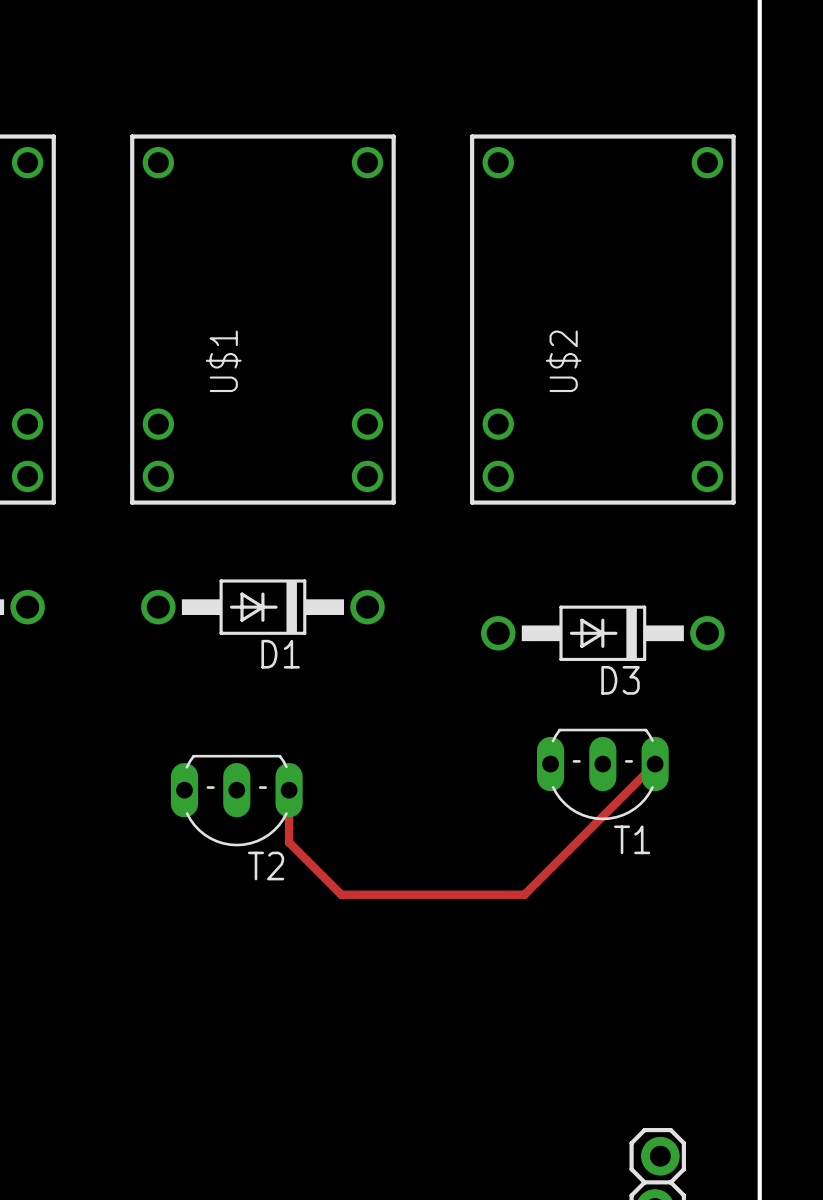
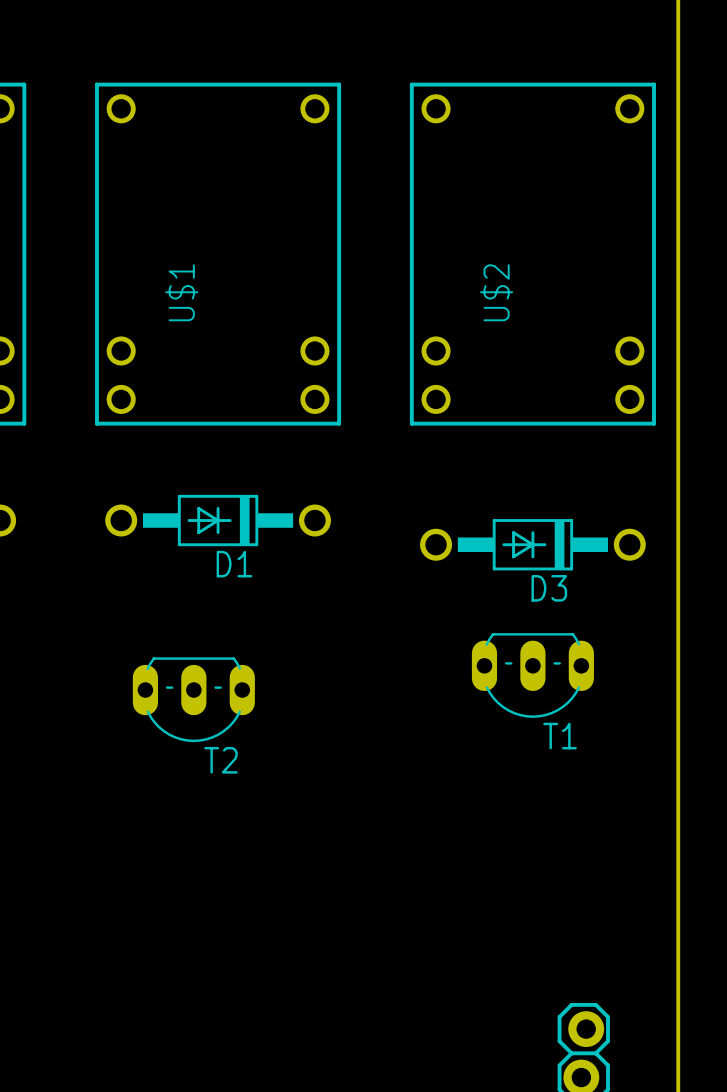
track: (655, 764) (524, 894) (341, 894) (289, 842) (289, 790) -> none

